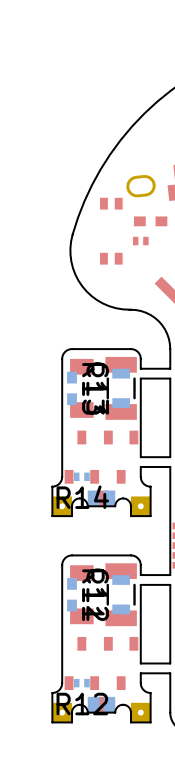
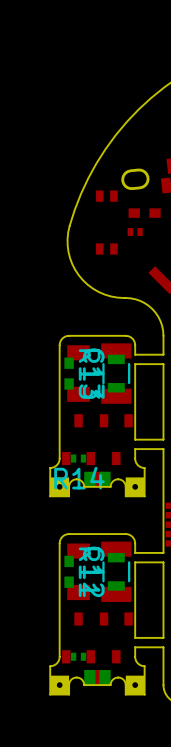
R12 name: R12 (82, 704) -> none

